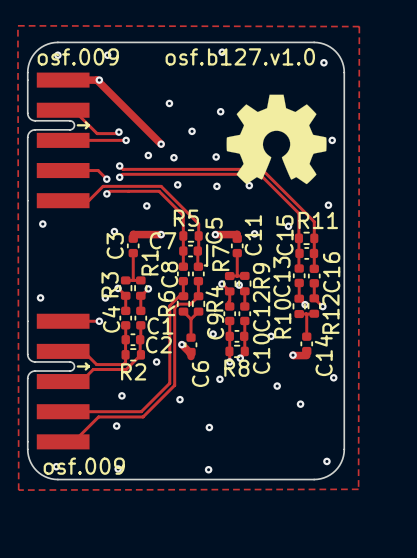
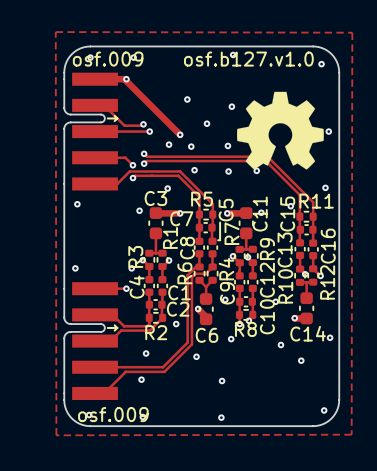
C3 footprint: [126, 234, 140, 258] -> [148, 207, 164, 240]
C11 footprint: [230, 234, 244, 258] -> [238, 207, 254, 240]
C3 name rotation: 0° (115, 245) -> 90° clockwise (155, 198)
C14 footprint: [300, 332, 314, 356] -> [299, 292, 315, 325]
C6 footprint: [184, 333, 198, 357] -> [198, 293, 214, 326]
C14 name rotation: 0° (323, 355) -> 90° clockwise (308, 333)
C6 name rotation: 0° (200, 374) -> 90° clockwise (206, 335)

